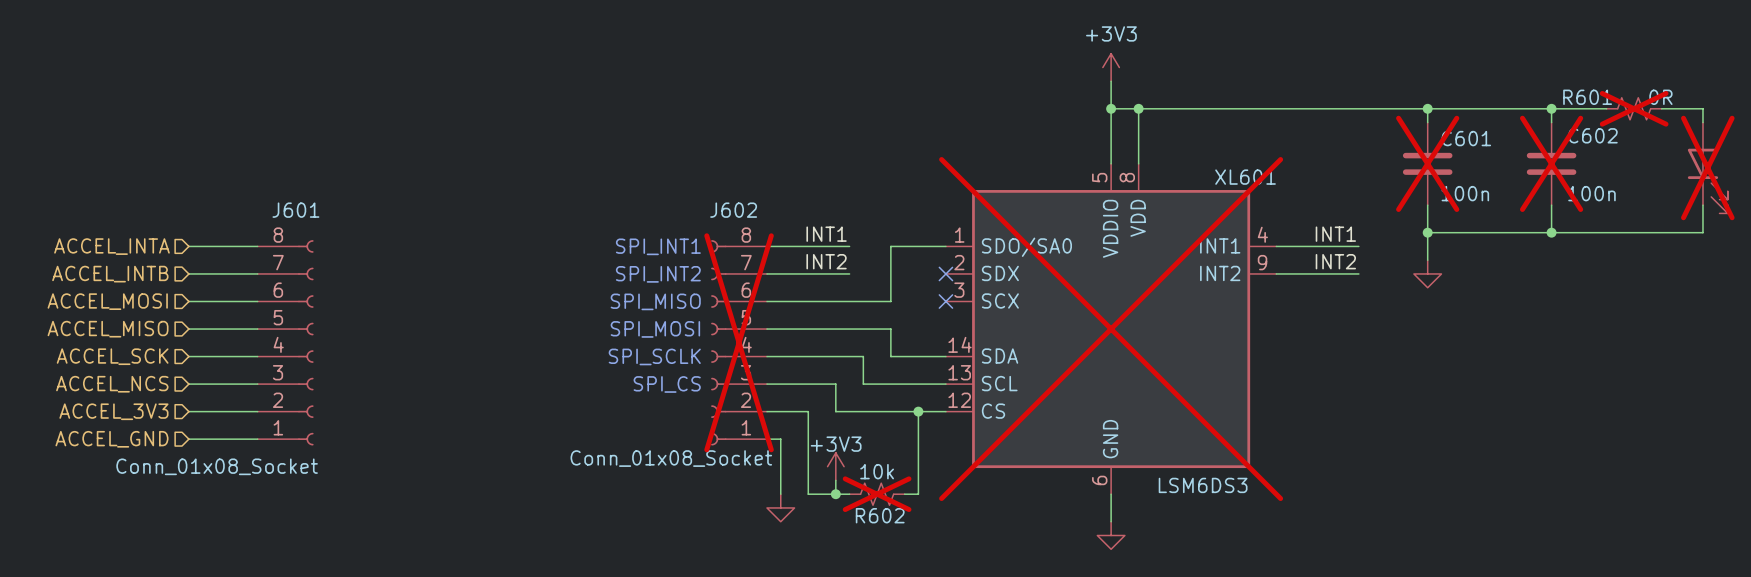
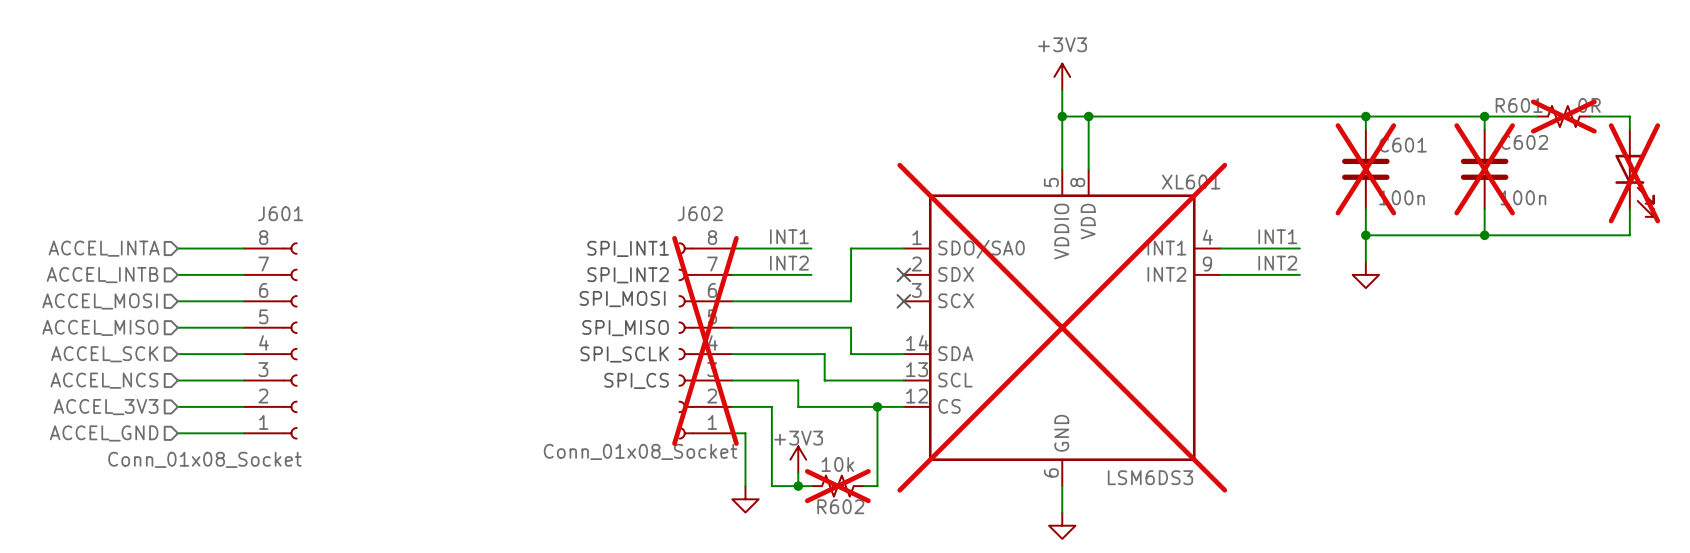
text: SPI_MISO (655, 301) -> SPI_MOSI (622, 299)
text: SPI_MOSI (655, 329) -> SPI_MISO (625, 328)

